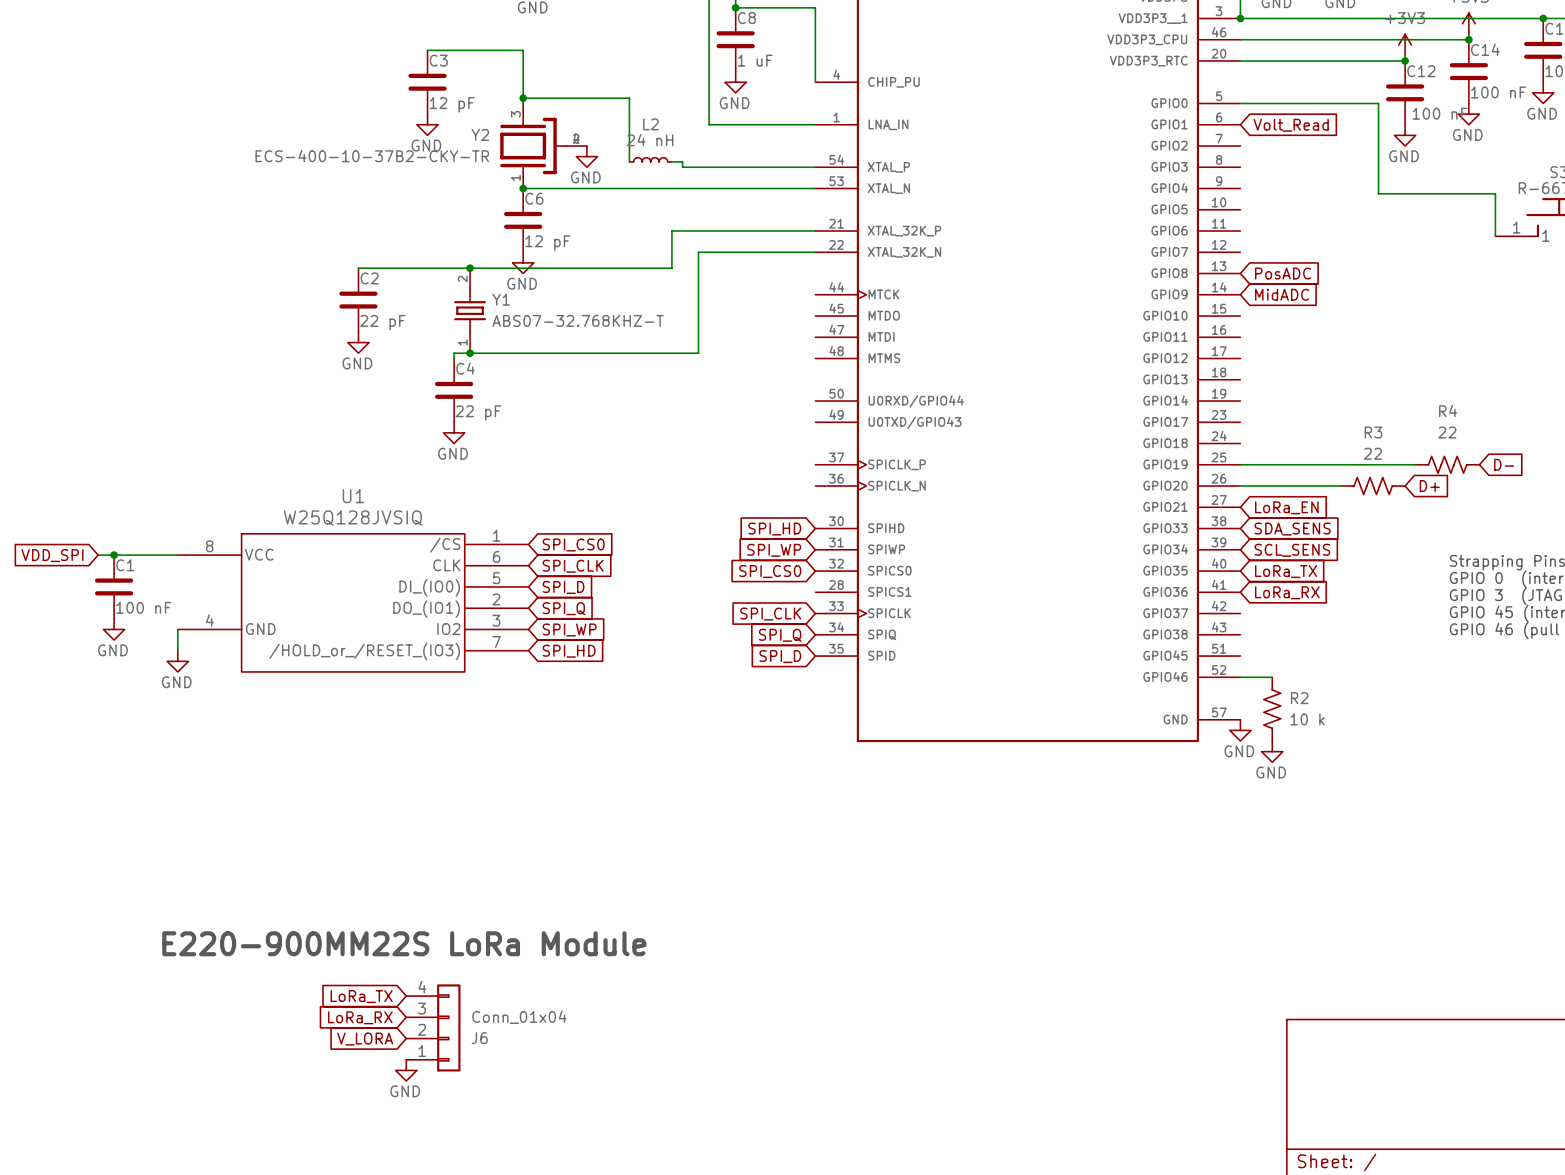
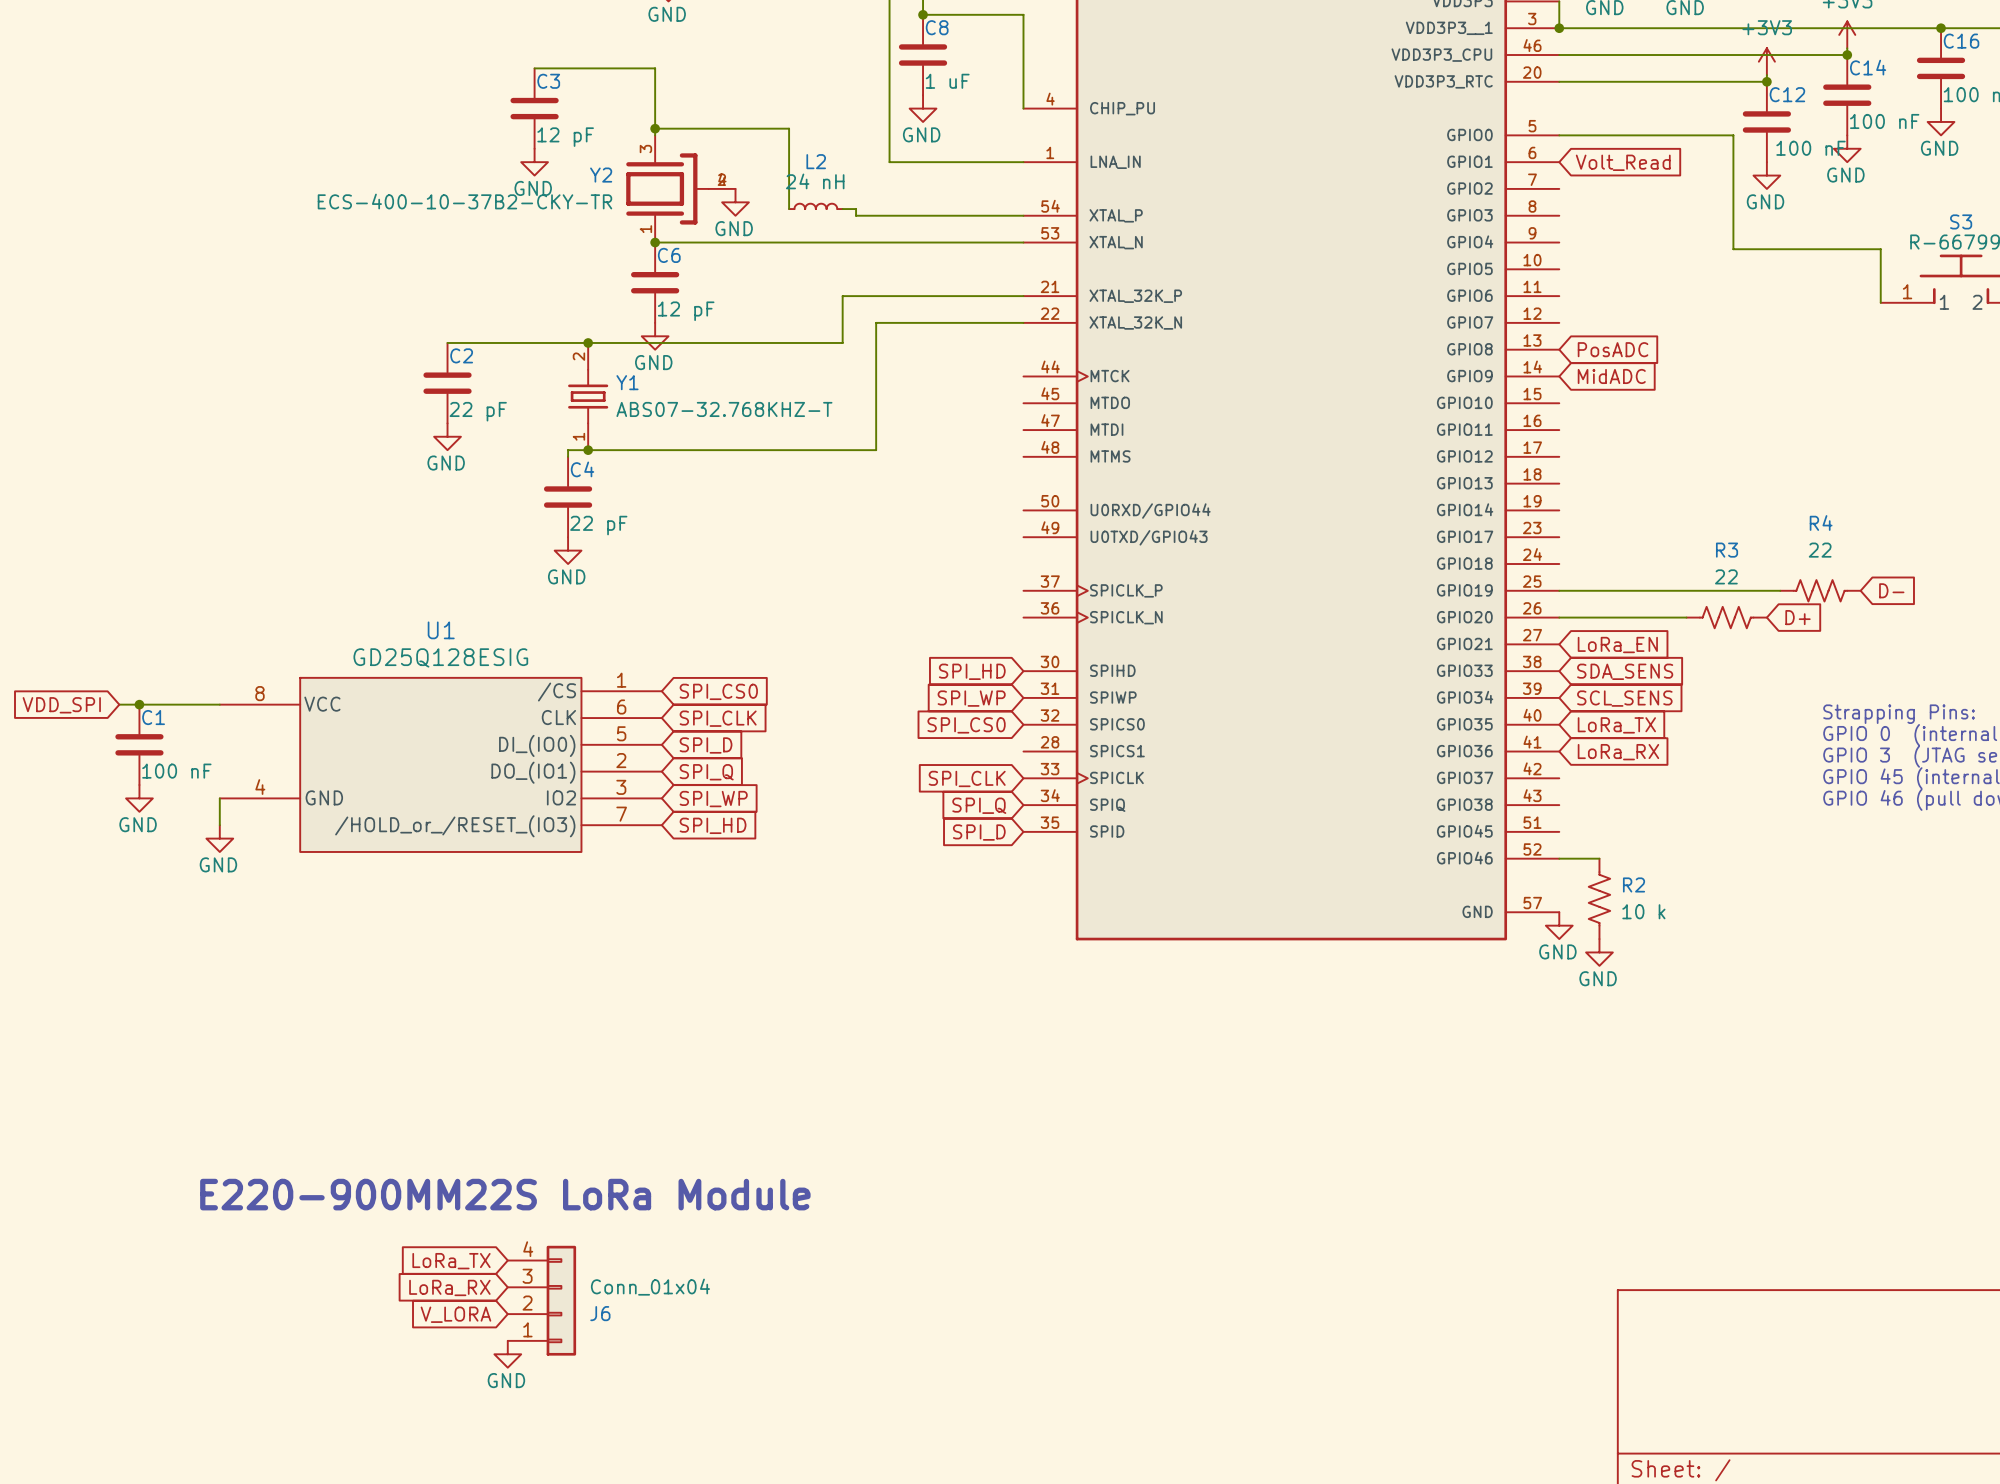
U1 value: W25Q128JVSIQ (353, 518) -> GD25Q128ESIG (440, 657)

